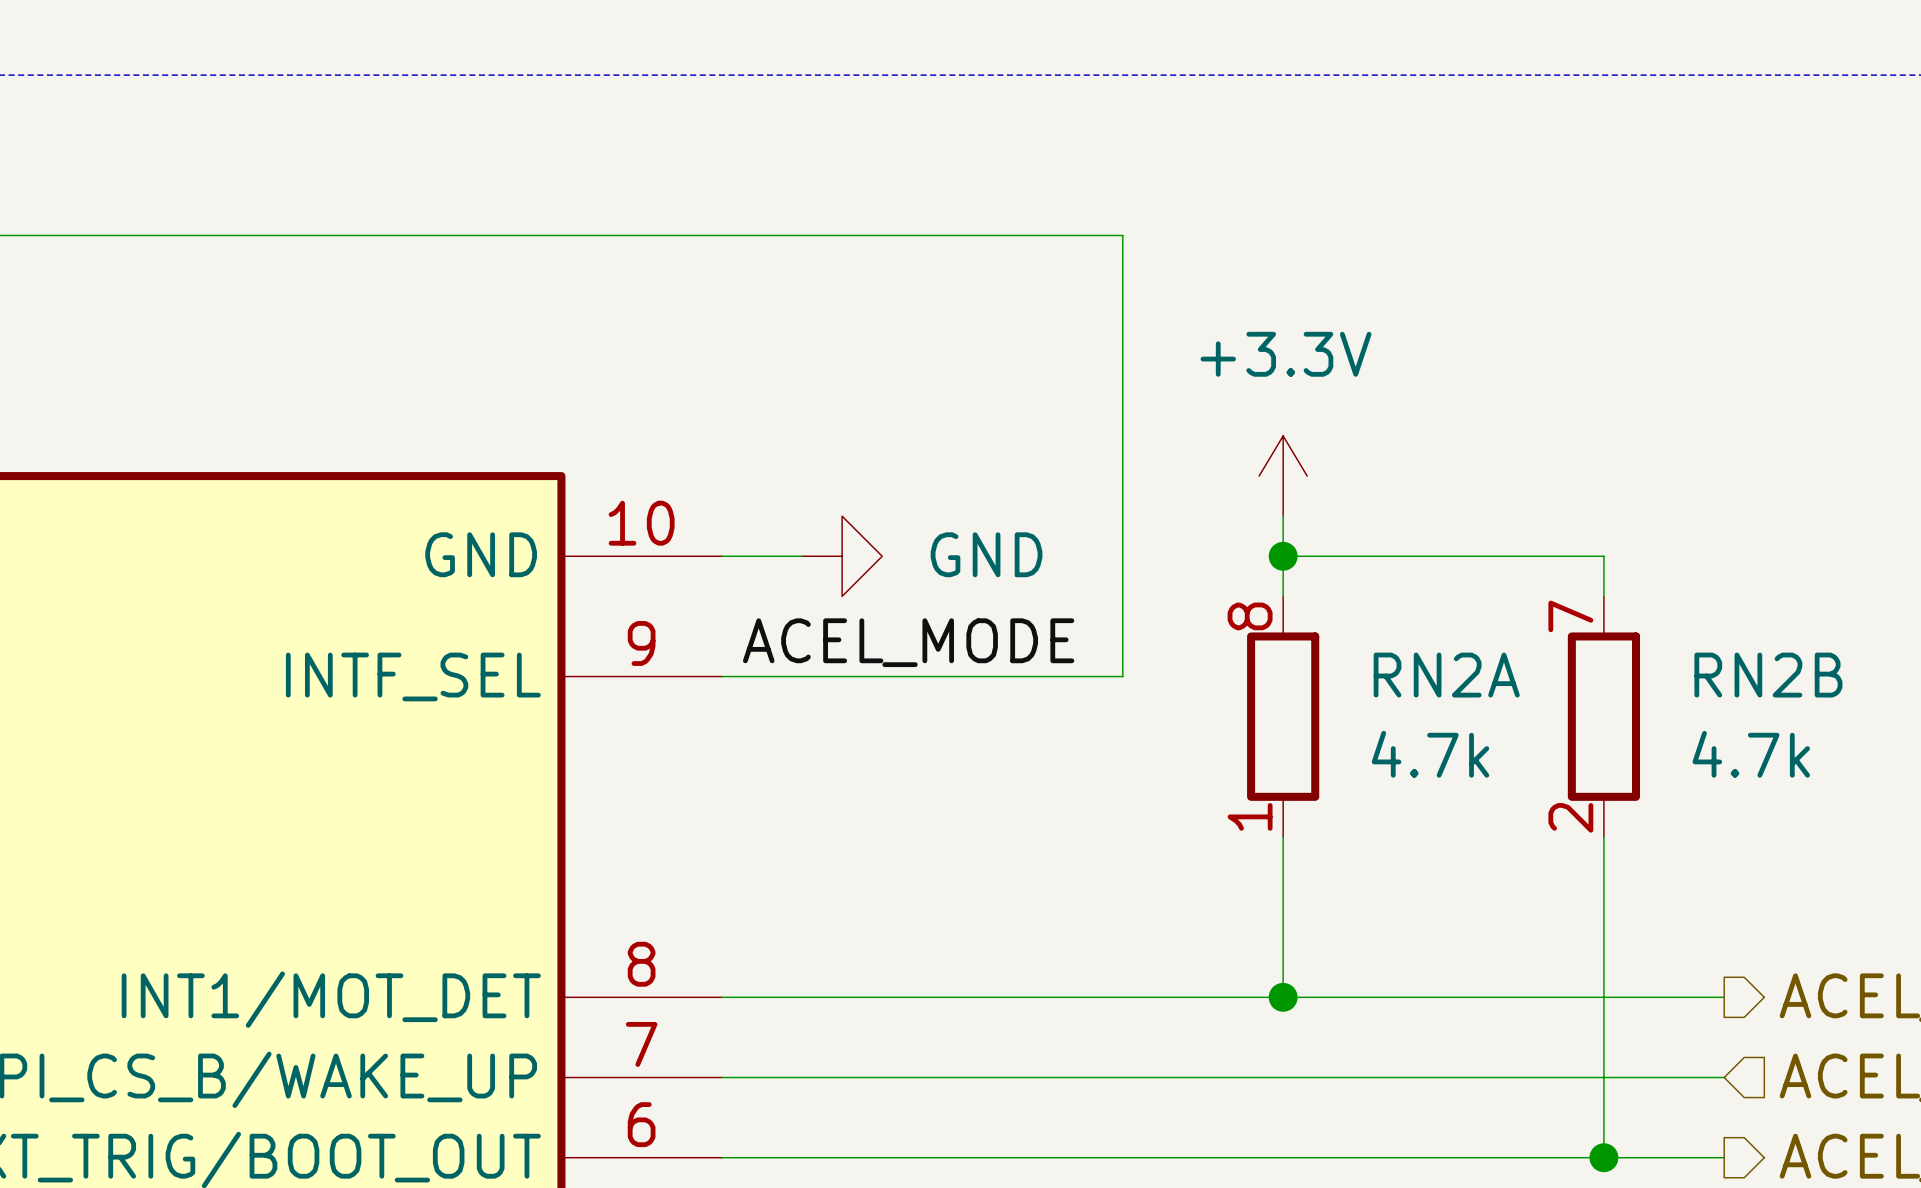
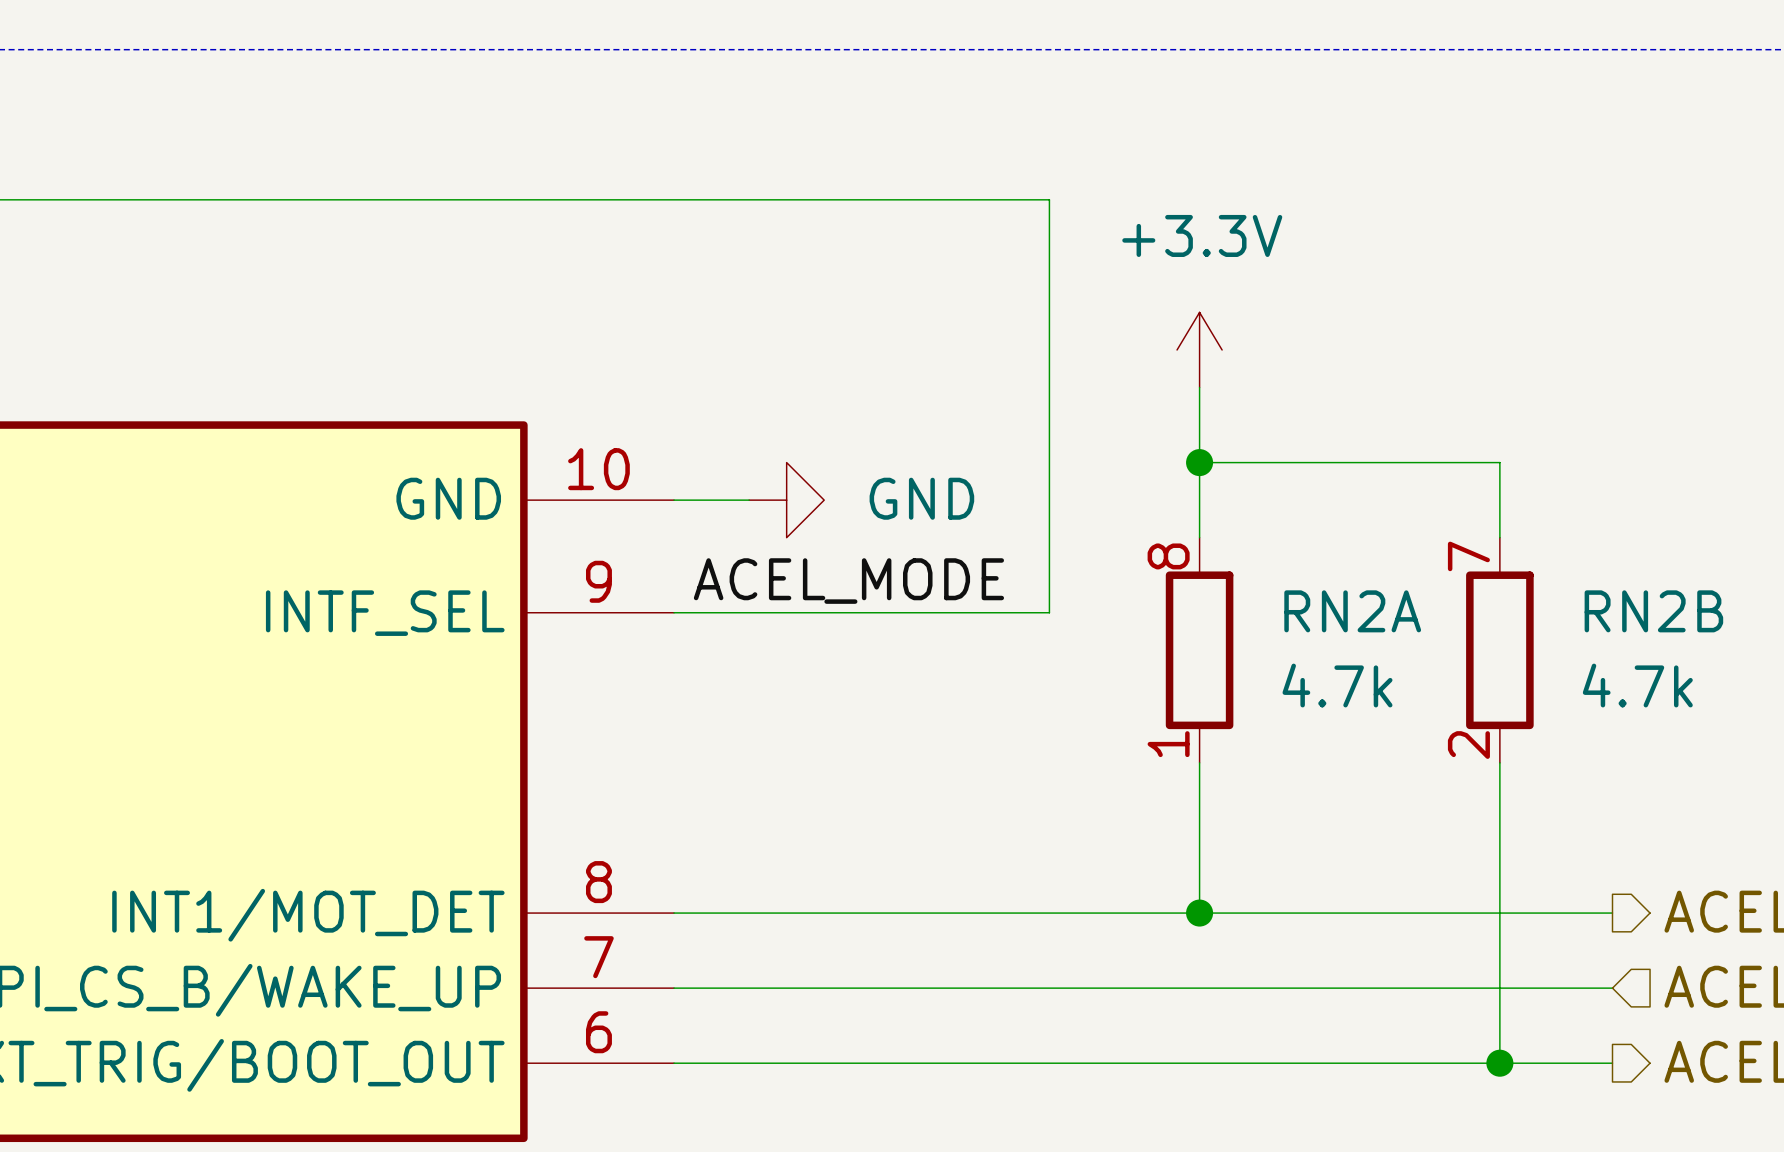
power symbol position: +3.3V (1283, 476) -> +3.3V (1199, 349)
wire: (1283, 556) (1603, 556) -> (1199, 387) (1199, 462) (1499, 462) (1499, 500)
junction position: (1283, 556) -> (1199, 462)

